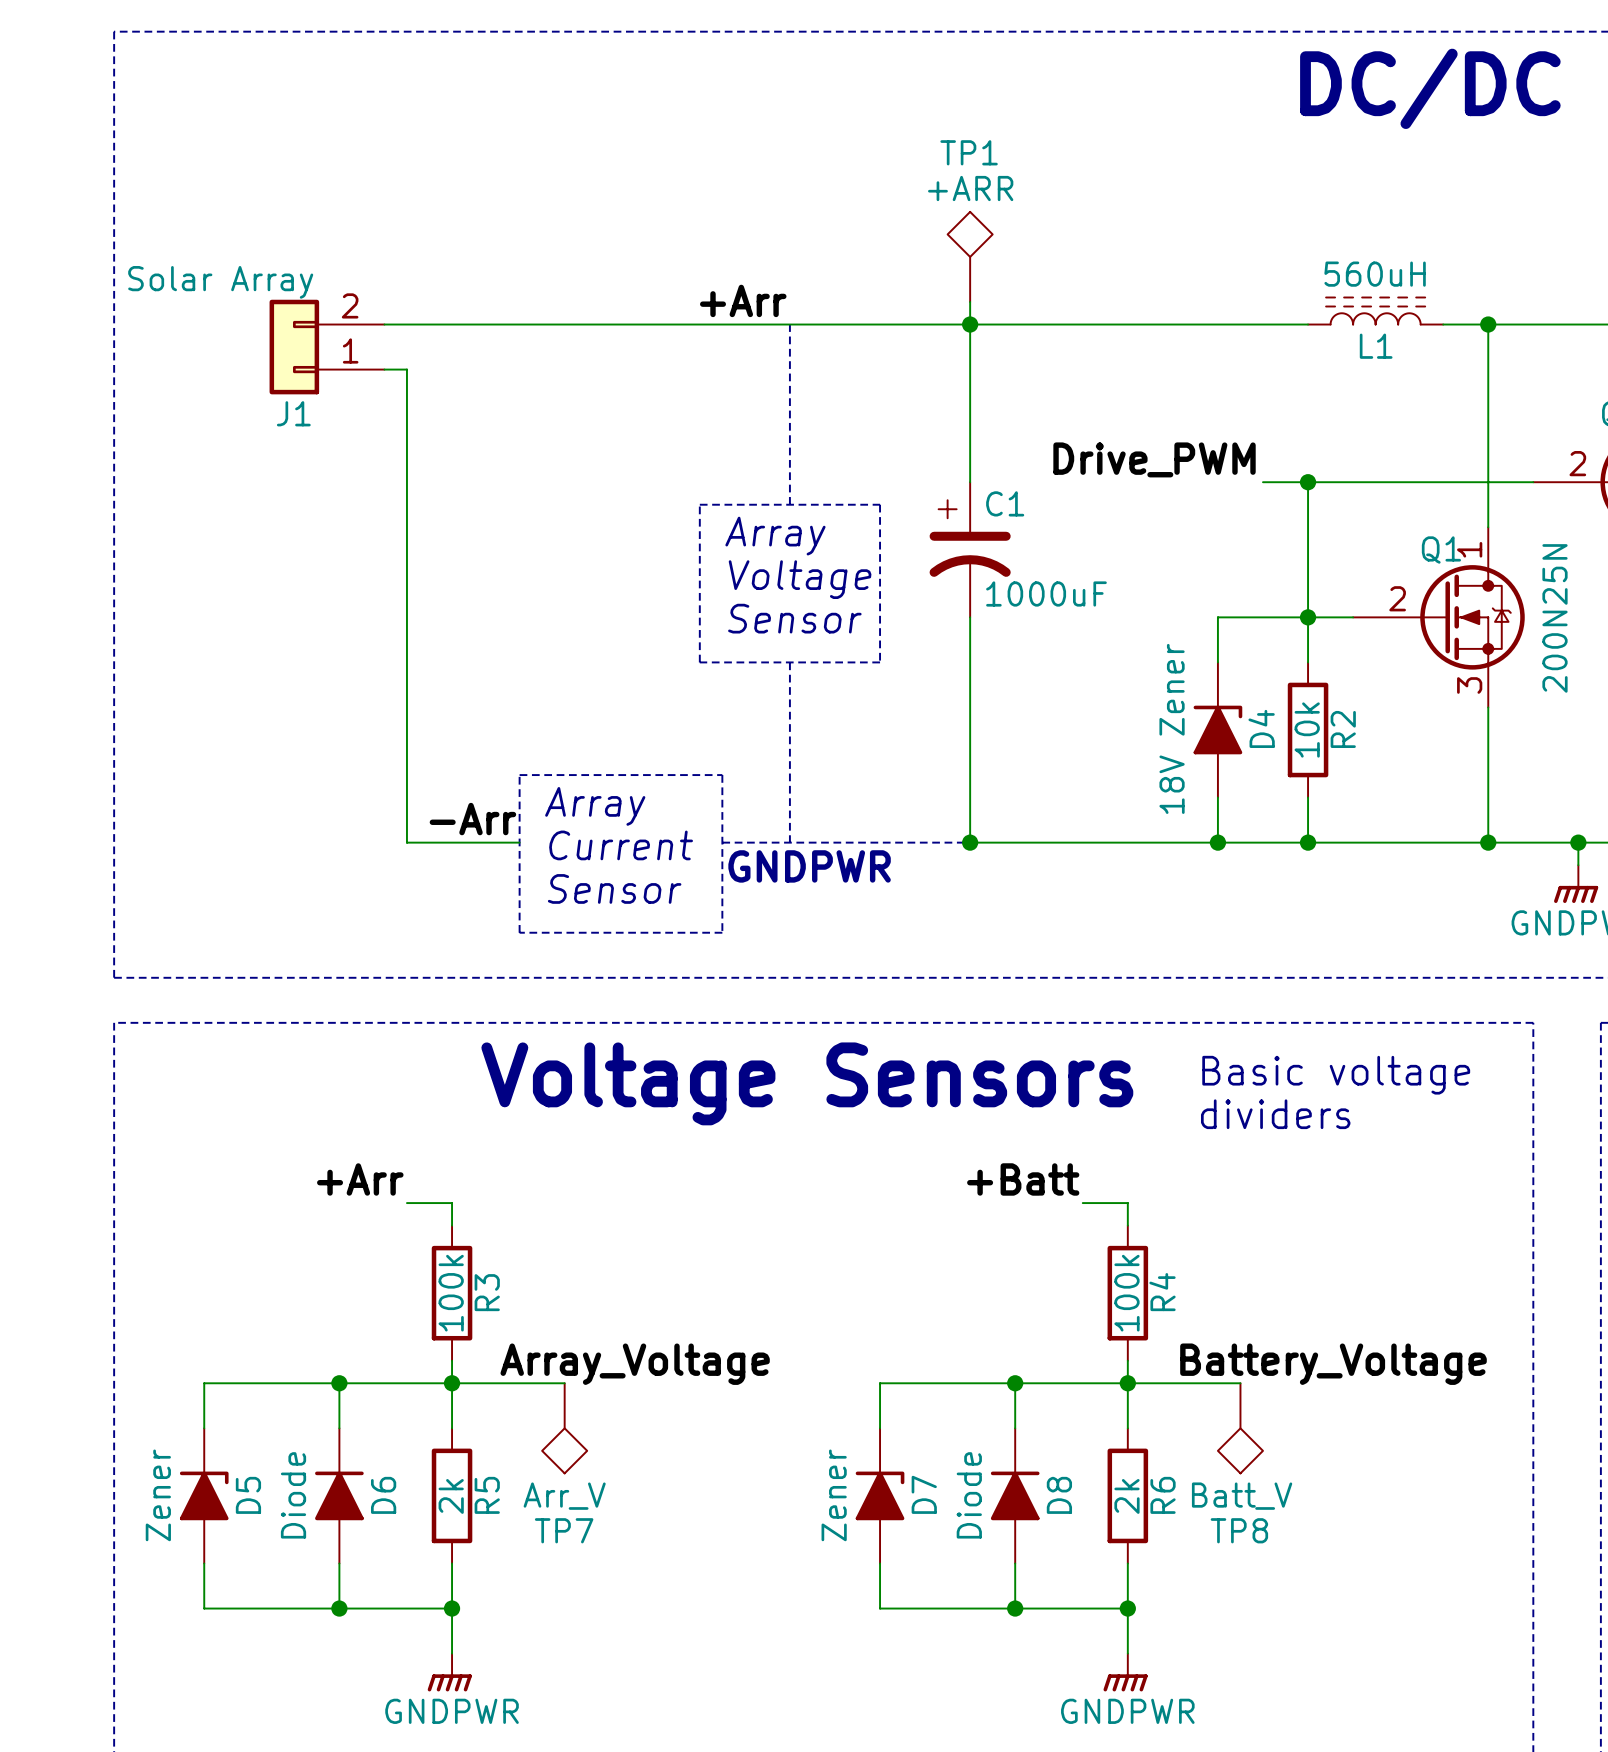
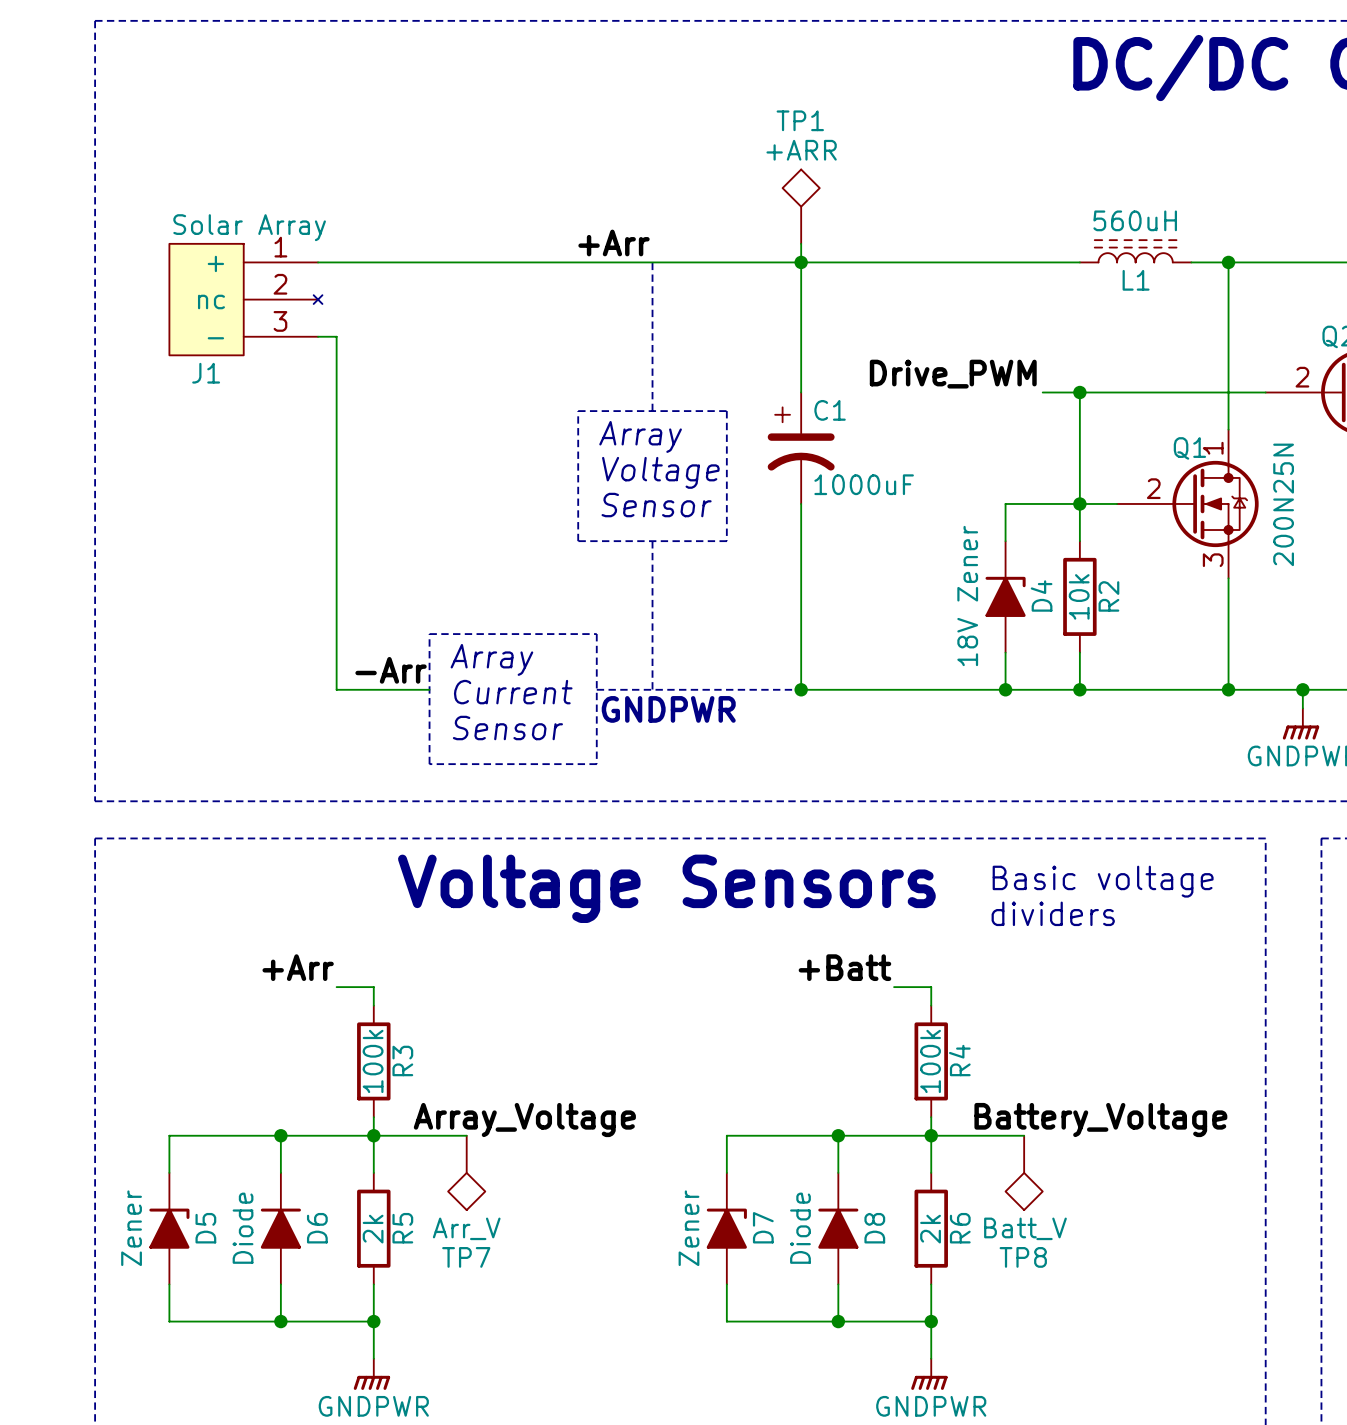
J1 value position: Solar Array (220, 282) -> Solar Array (249, 227)
J1 symbol: [269, 299, 385, 395] -> [169, 243, 323, 356]
wire: (384, 369) (406, 369) (406, 414) -> (318, 336) (336, 336)

